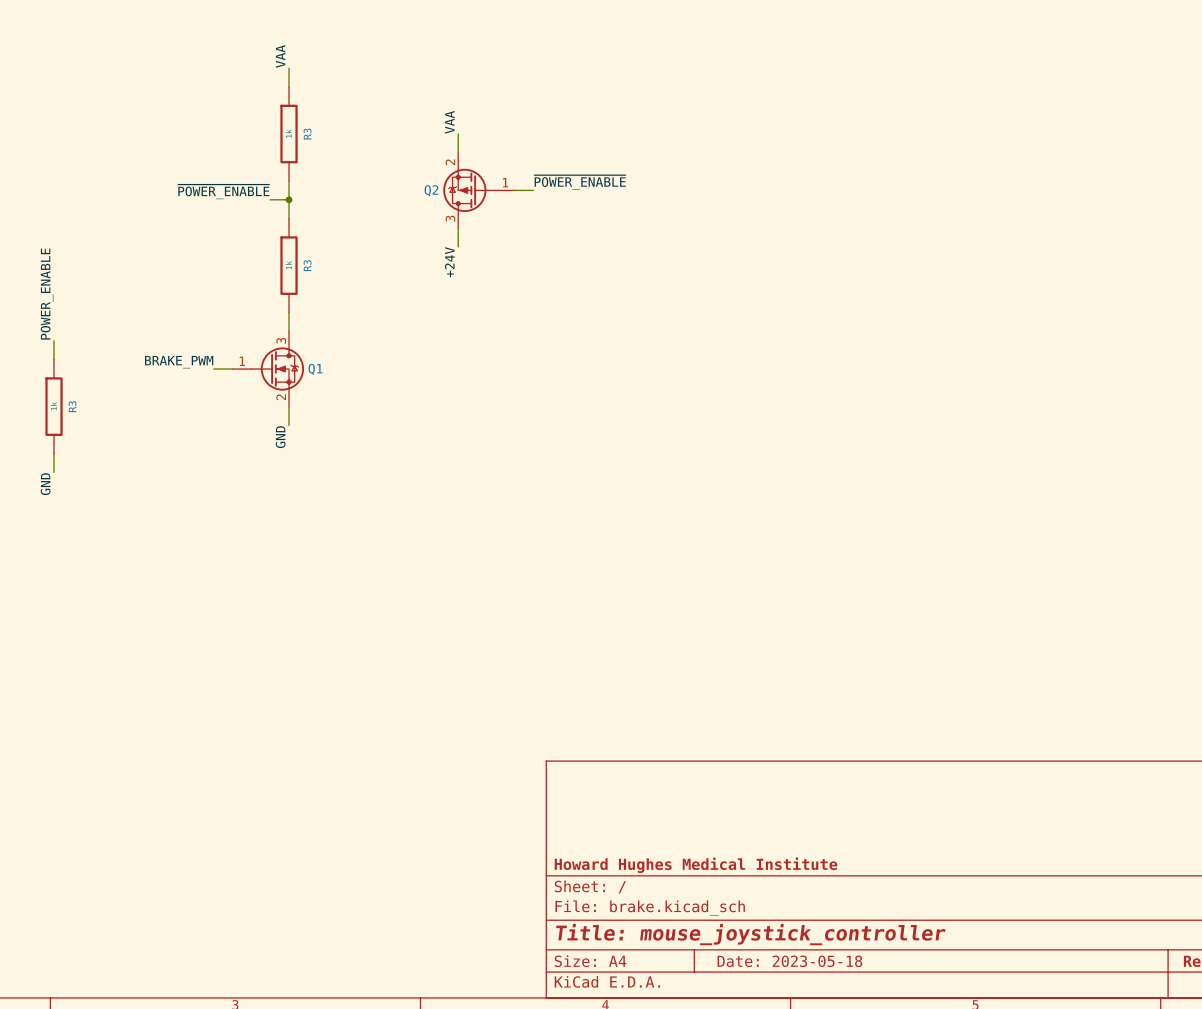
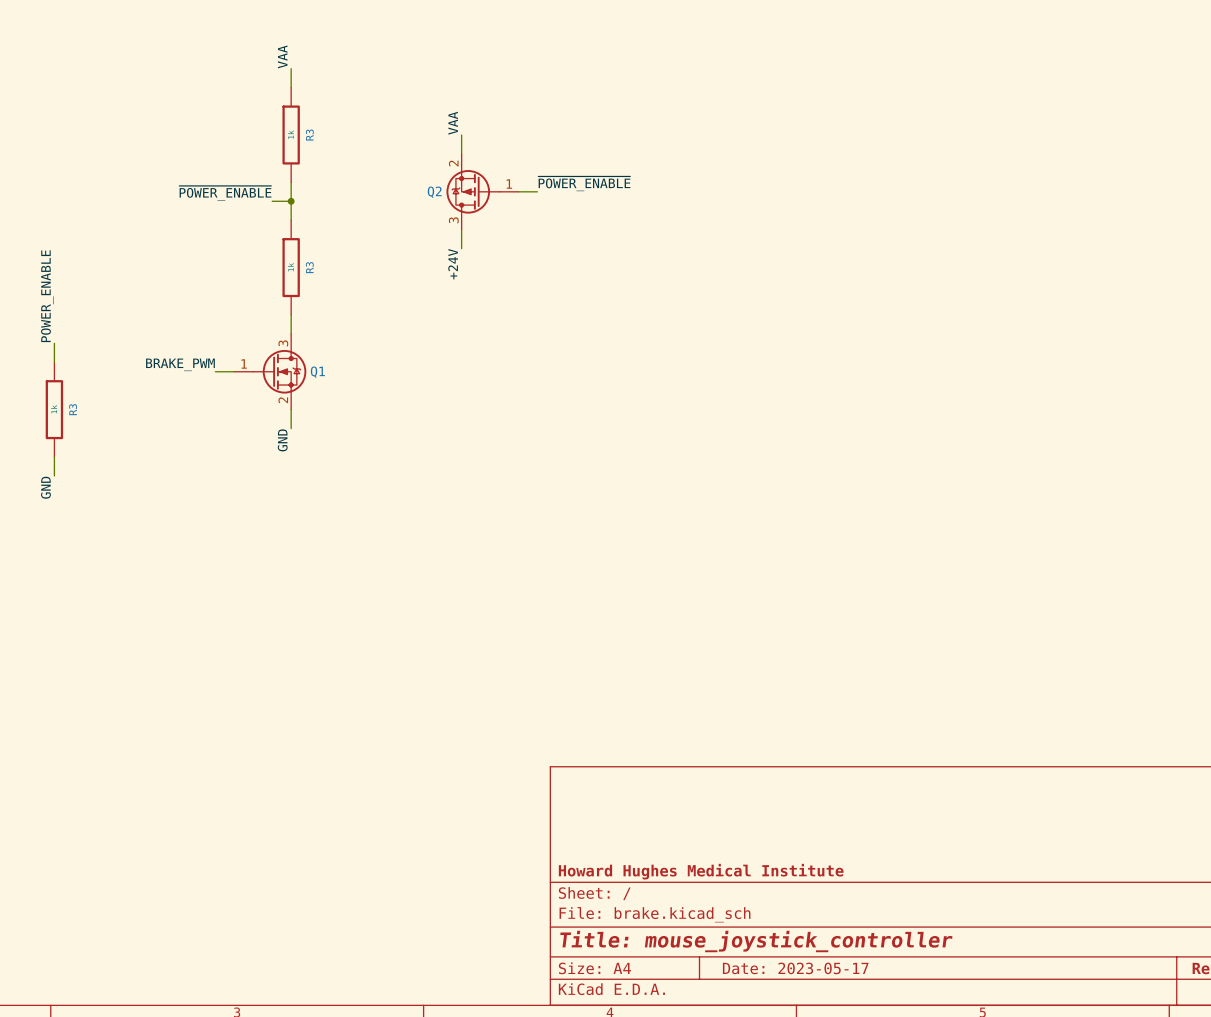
title block: Date: 2023-05-18 (789, 961) -> Date: 2023-05-17 (795, 968)

